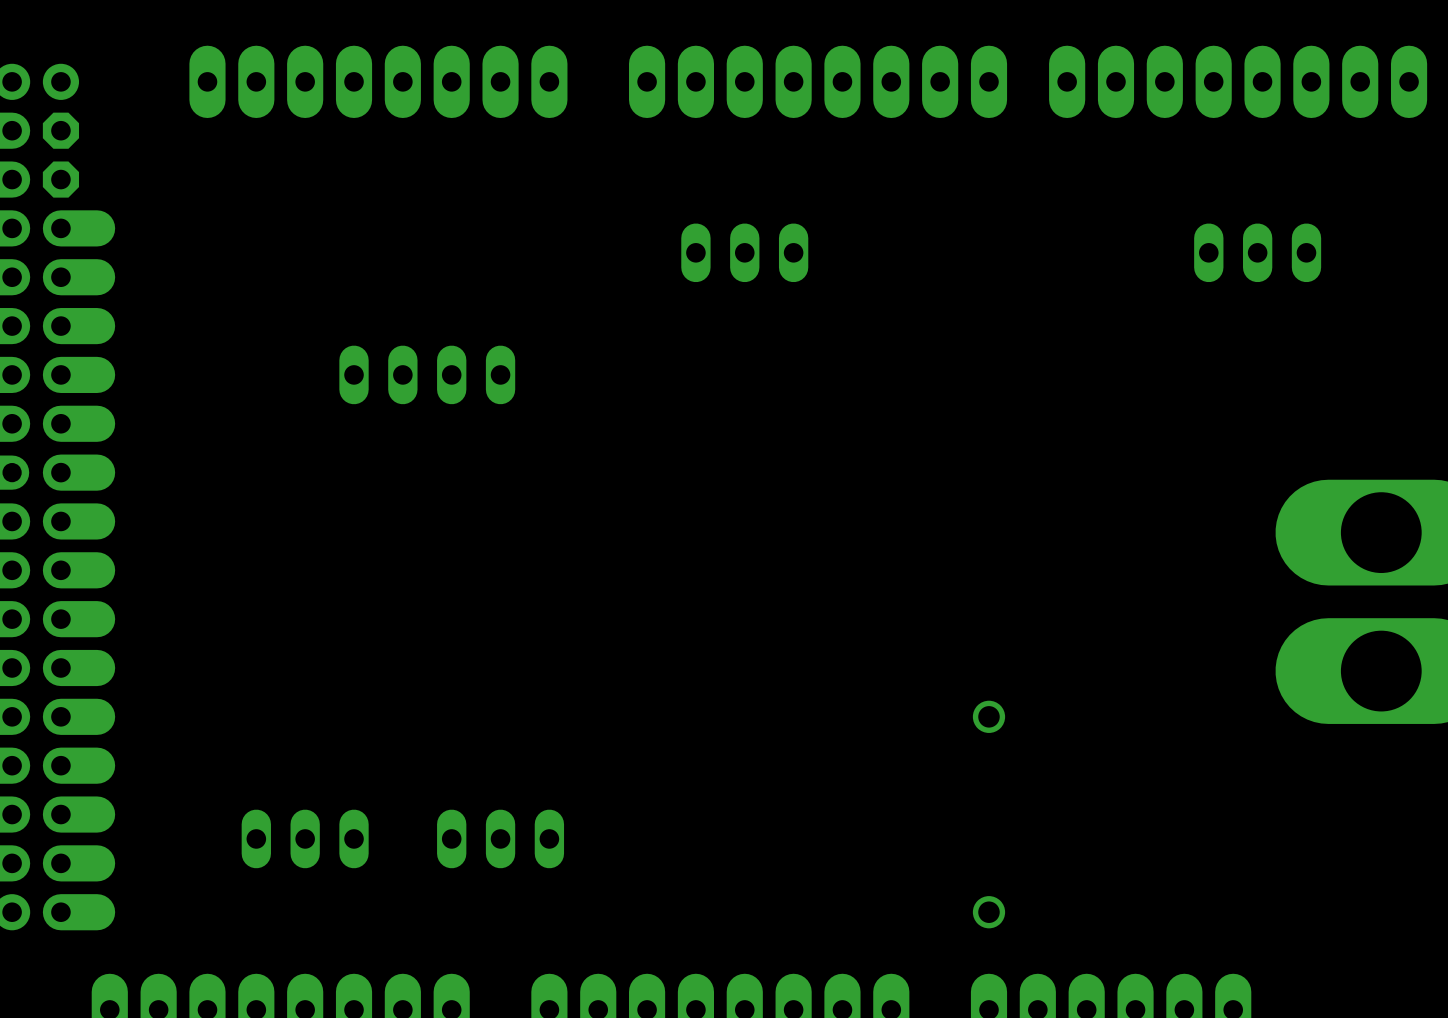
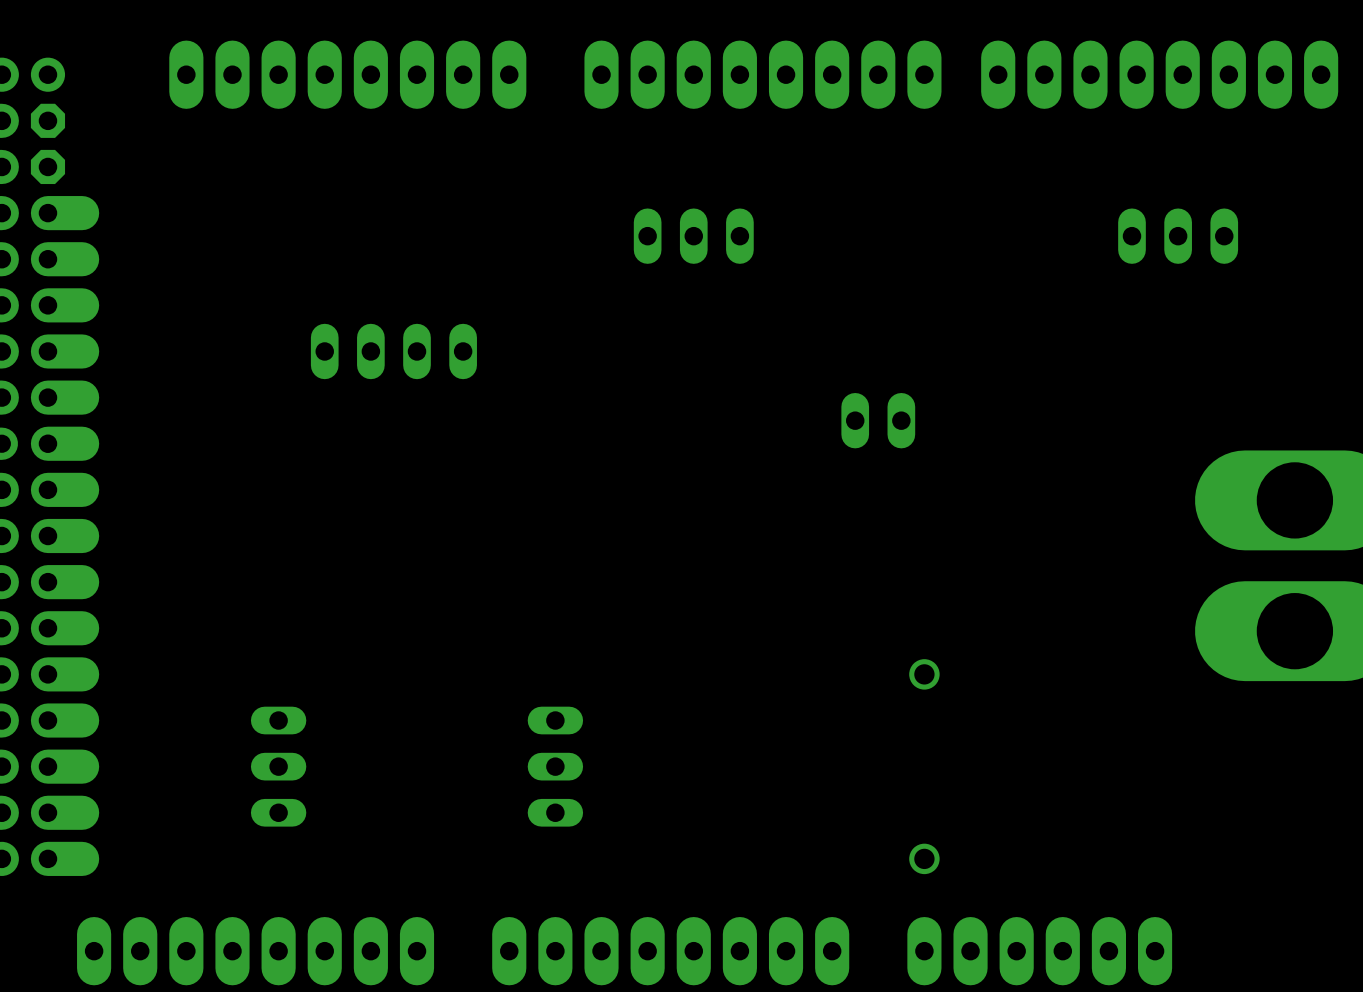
part: none -> (878, 420)
part: none -> (555, 766)
part rotation: 0° (305, 838) -> 90° clockwise (278, 766)
part: (500, 838) -> none

